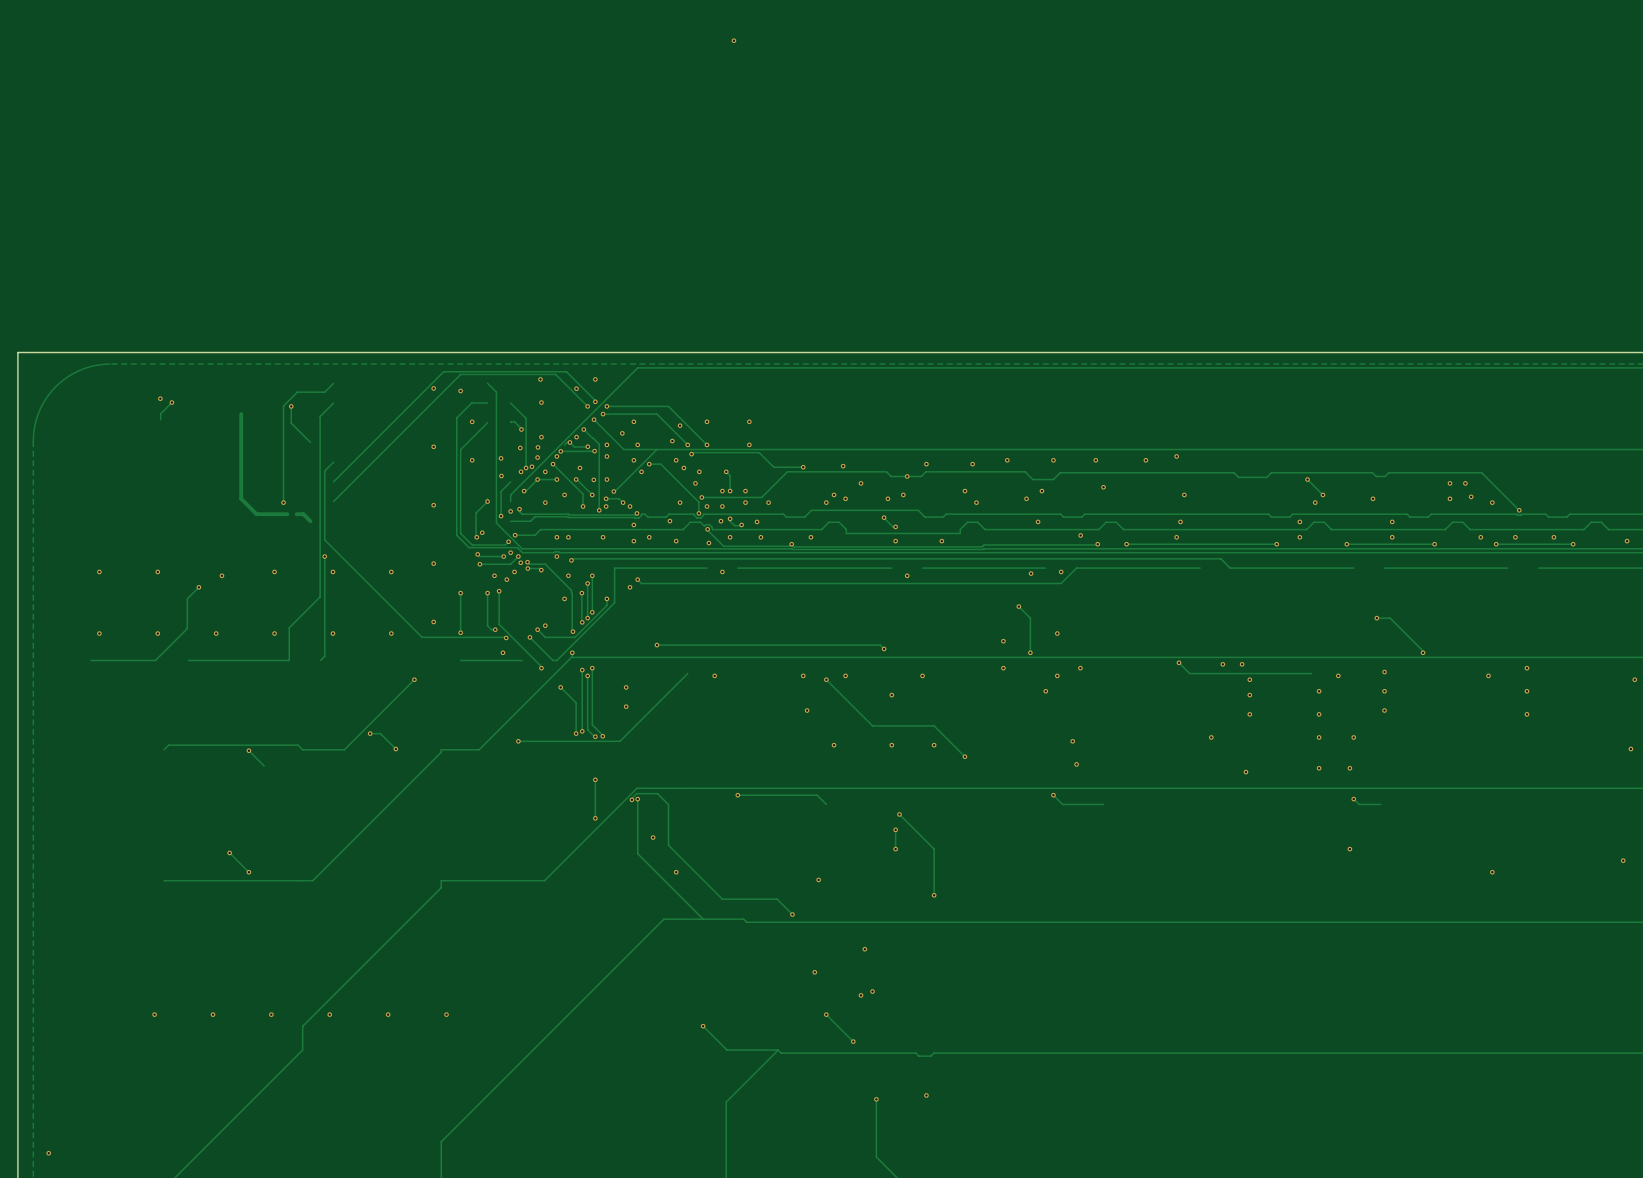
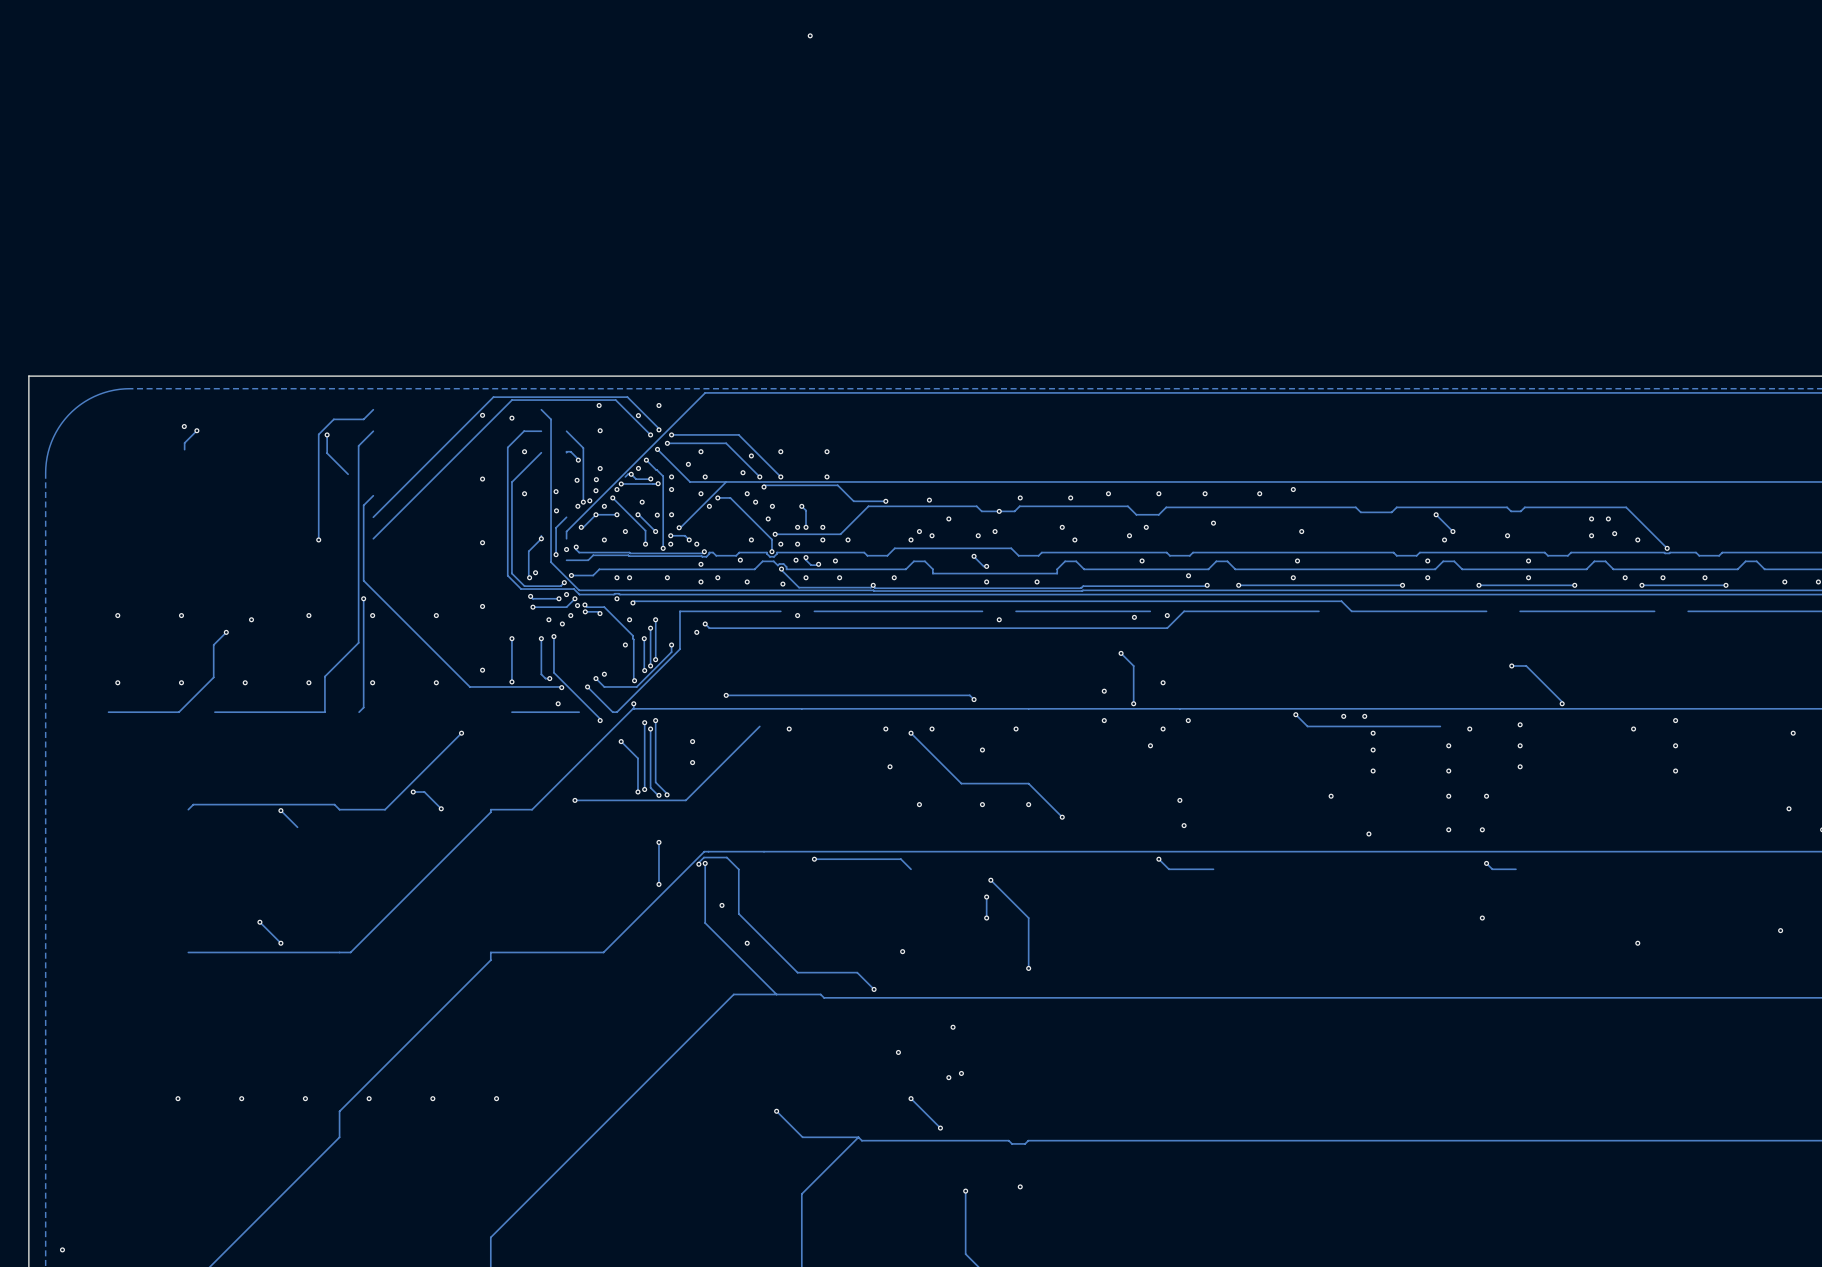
track: (241, 414) (241, 498) (256, 514) (287, 514) -> none
track: (296, 514) (303, 514) (310, 521) -> none

